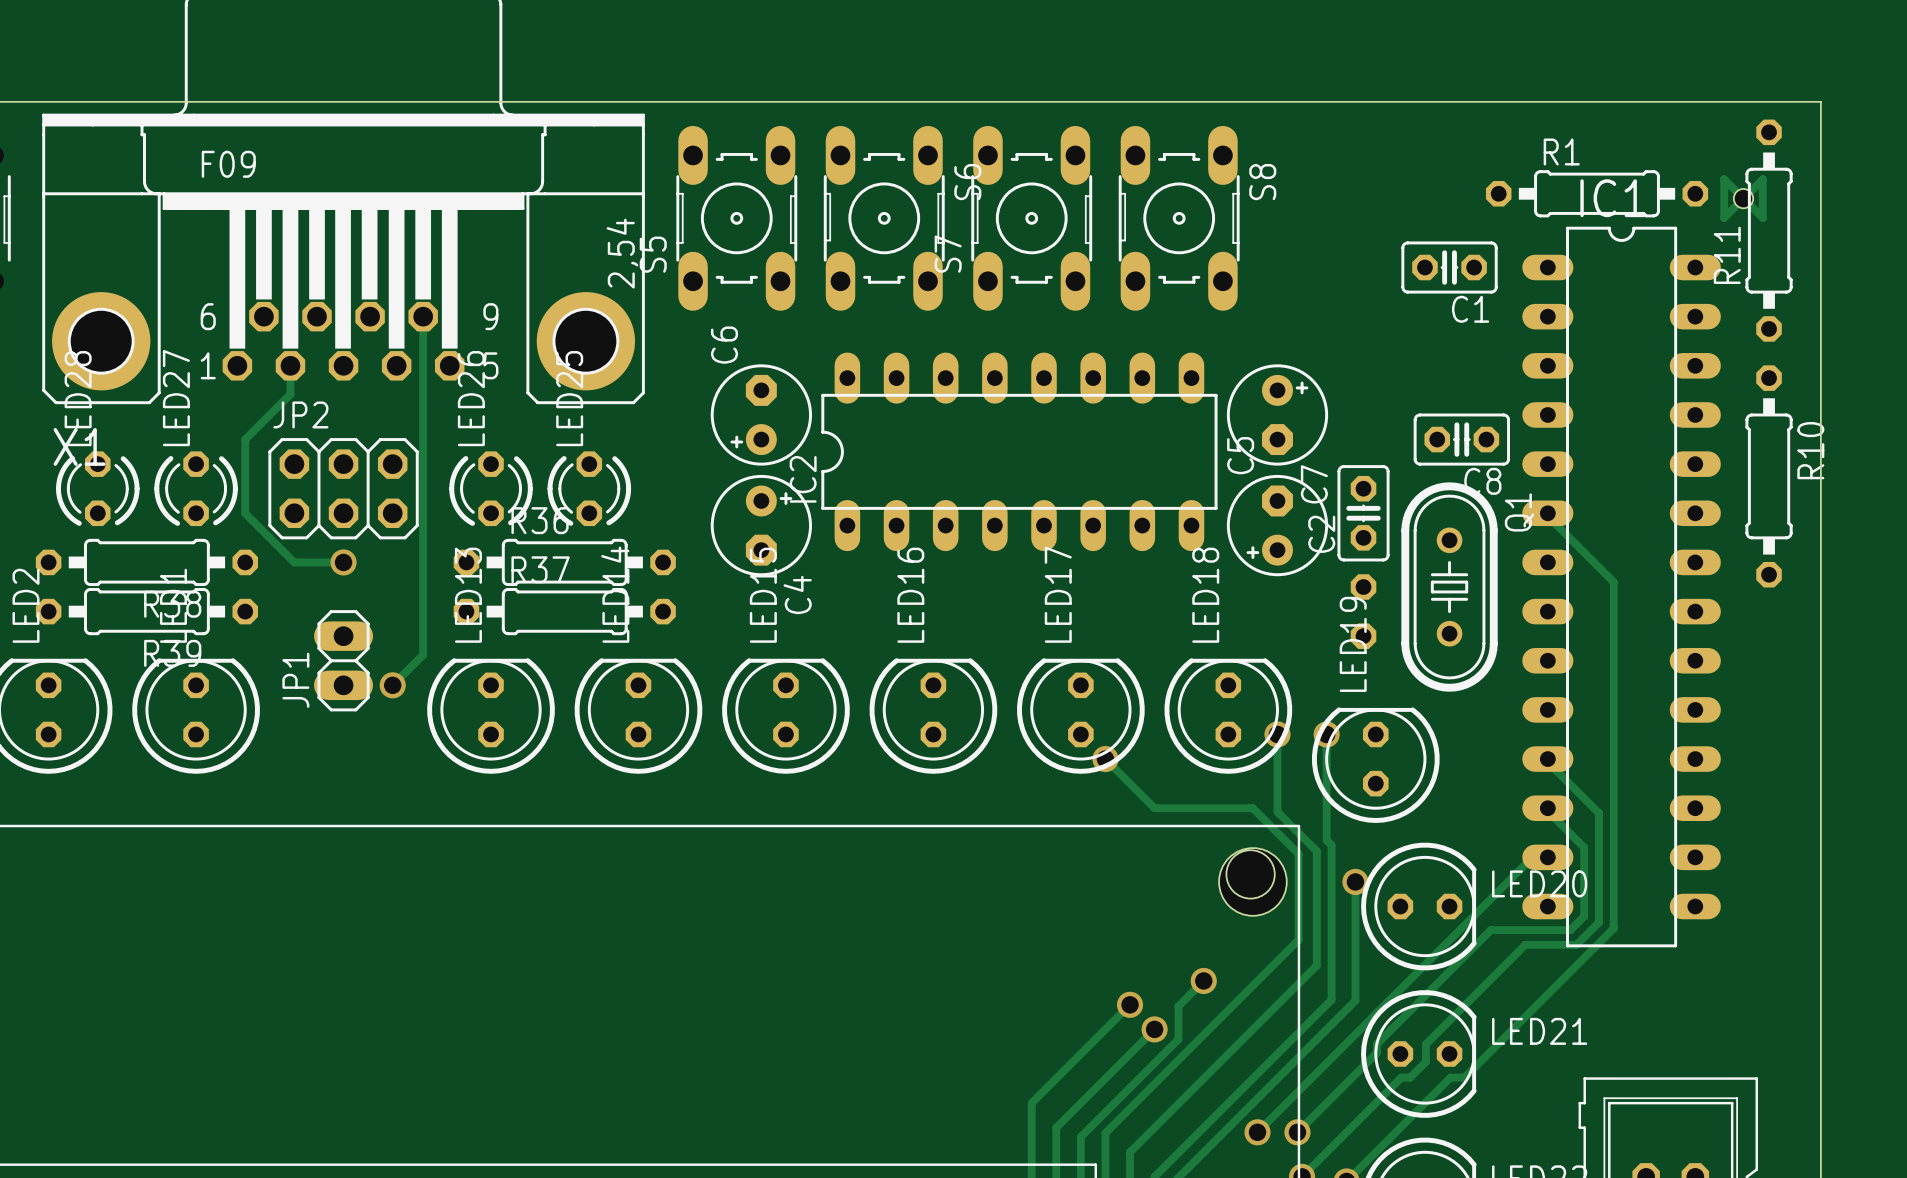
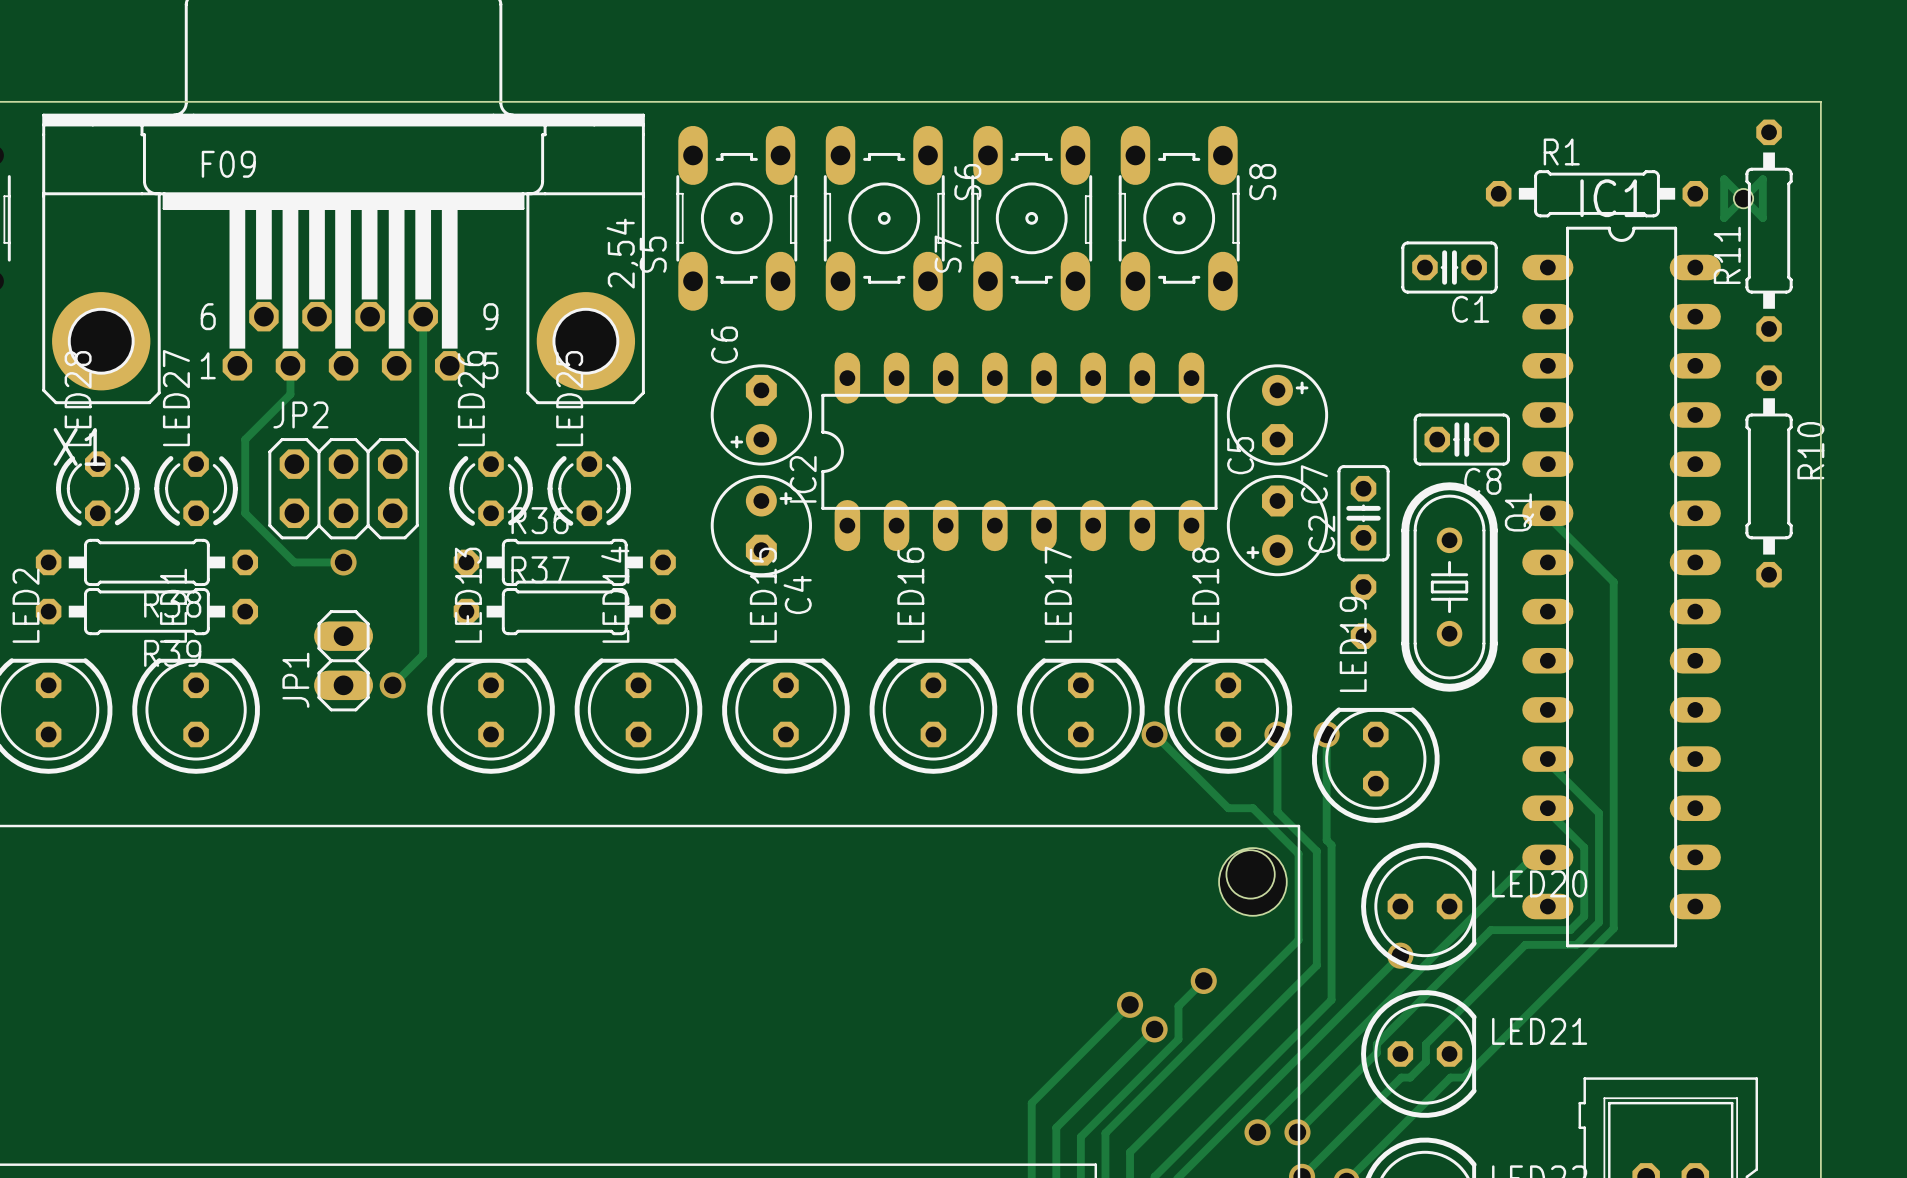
track: (1105, 759) (1154, 808) (1228, 808) -> (1154, 734) (1228, 808)
via position: (1105, 759) -> (1154, 734)
track: (1355, 881) (1355, 1000) -> (1400, 955) (1355, 1000)
via position: (1355, 881) -> (1400, 955)

